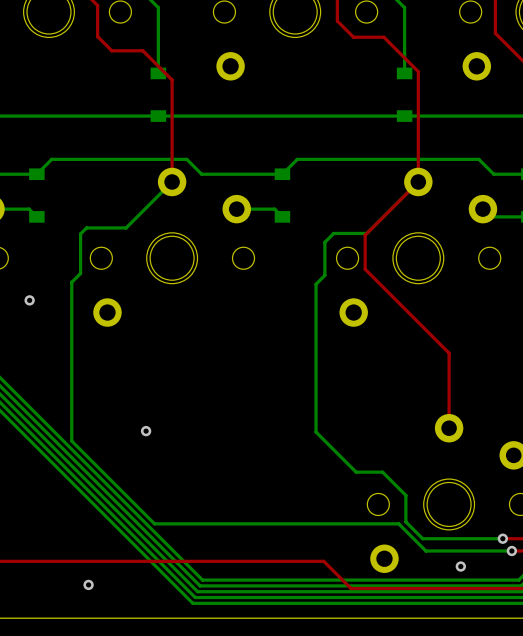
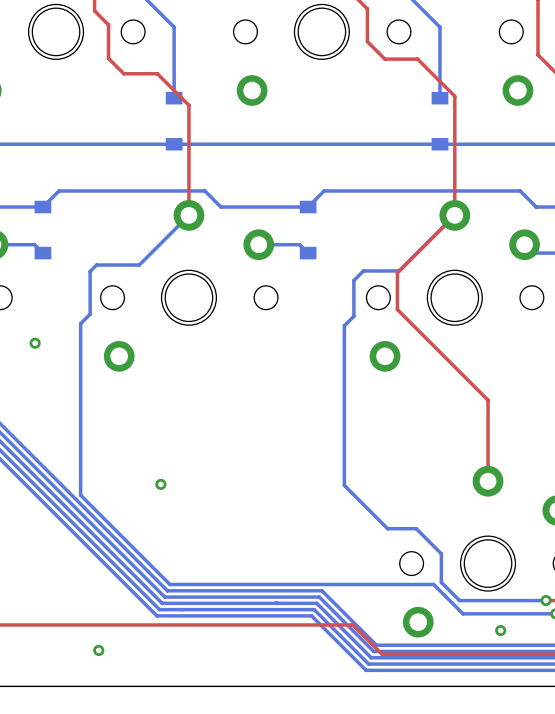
bottom track: (152, 529) (202, 580) (345, 580) -> (167, 590) (322, 590) (376, 645)
bottom track: (149, 535) (200, 585) (343, 585) -> (164, 597) (319, 597) (373, 651)
bottom track: (147, 541) (197, 591) (340, 591) -> (162, 603) (316, 603) (371, 657)
bottom track: (144, 547) (195, 597) (338, 597) -> (159, 609) (314, 609) (368, 664)
bottom track: (142, 552) (192, 603) (336, 603) -> (156, 615) (311, 615) (366, 670)

